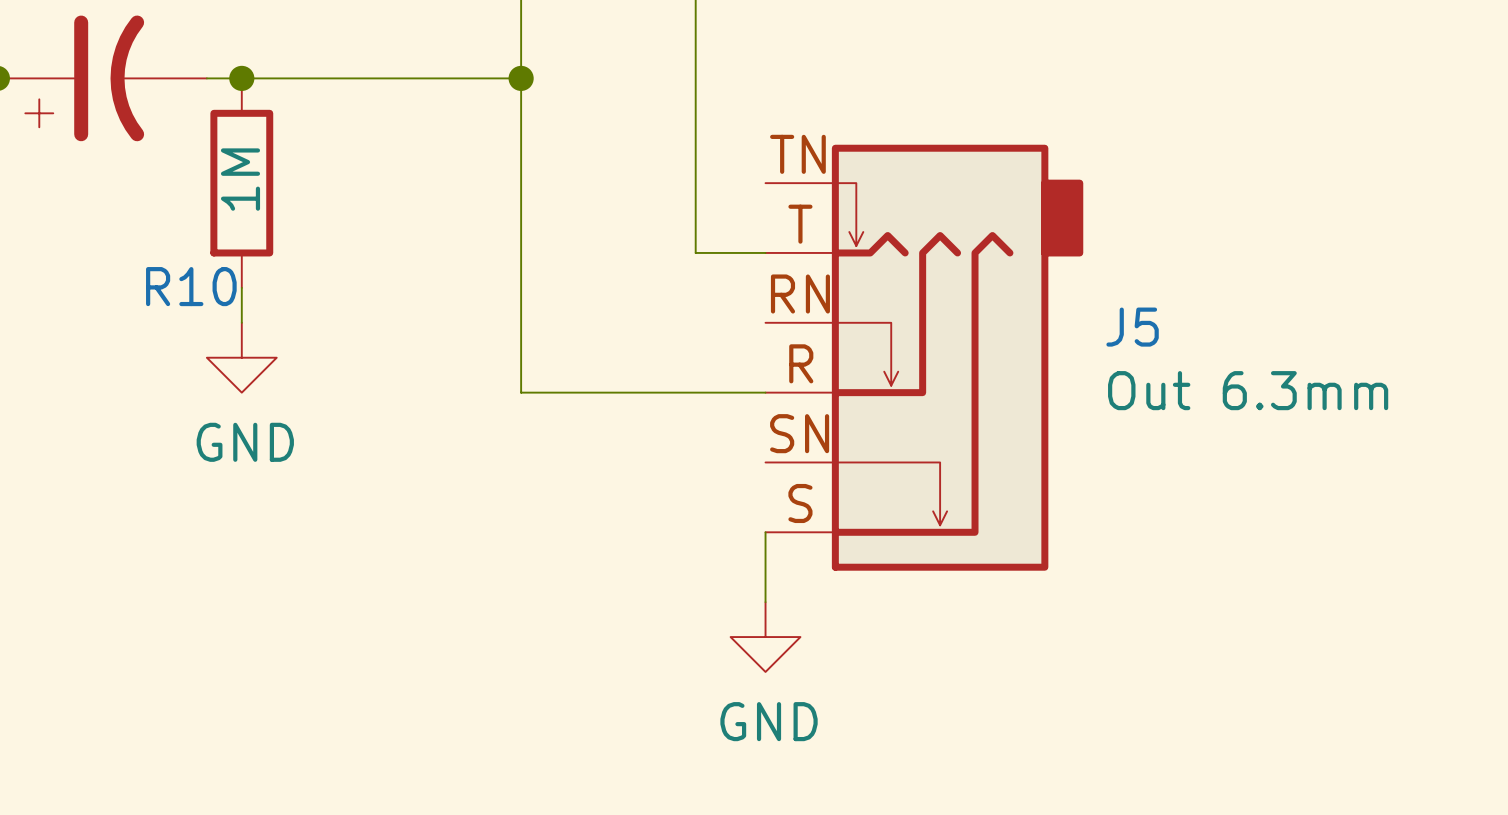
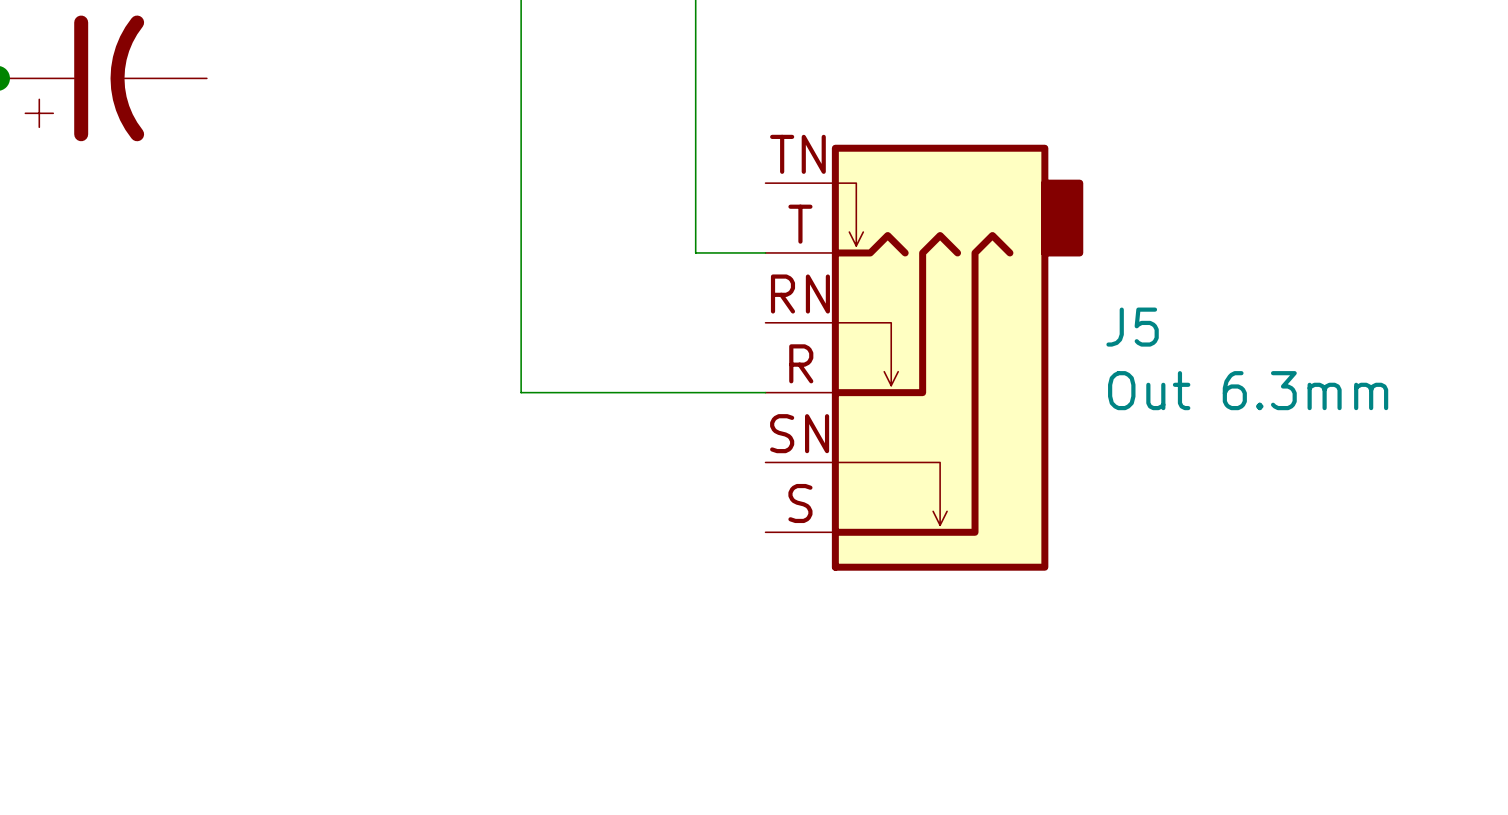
wire: (206, 78) (521, 78) -> none
junction: (241, 78) -> none
junction: (521, 78) -> none
R10: 1M (241, 183) -> none
wire: (241, 287) (241, 322) -> none
power symbol: GND (241, 357) -> none
wire: (765, 532) (765, 602) -> none
power symbol: GND (765, 637) -> none

